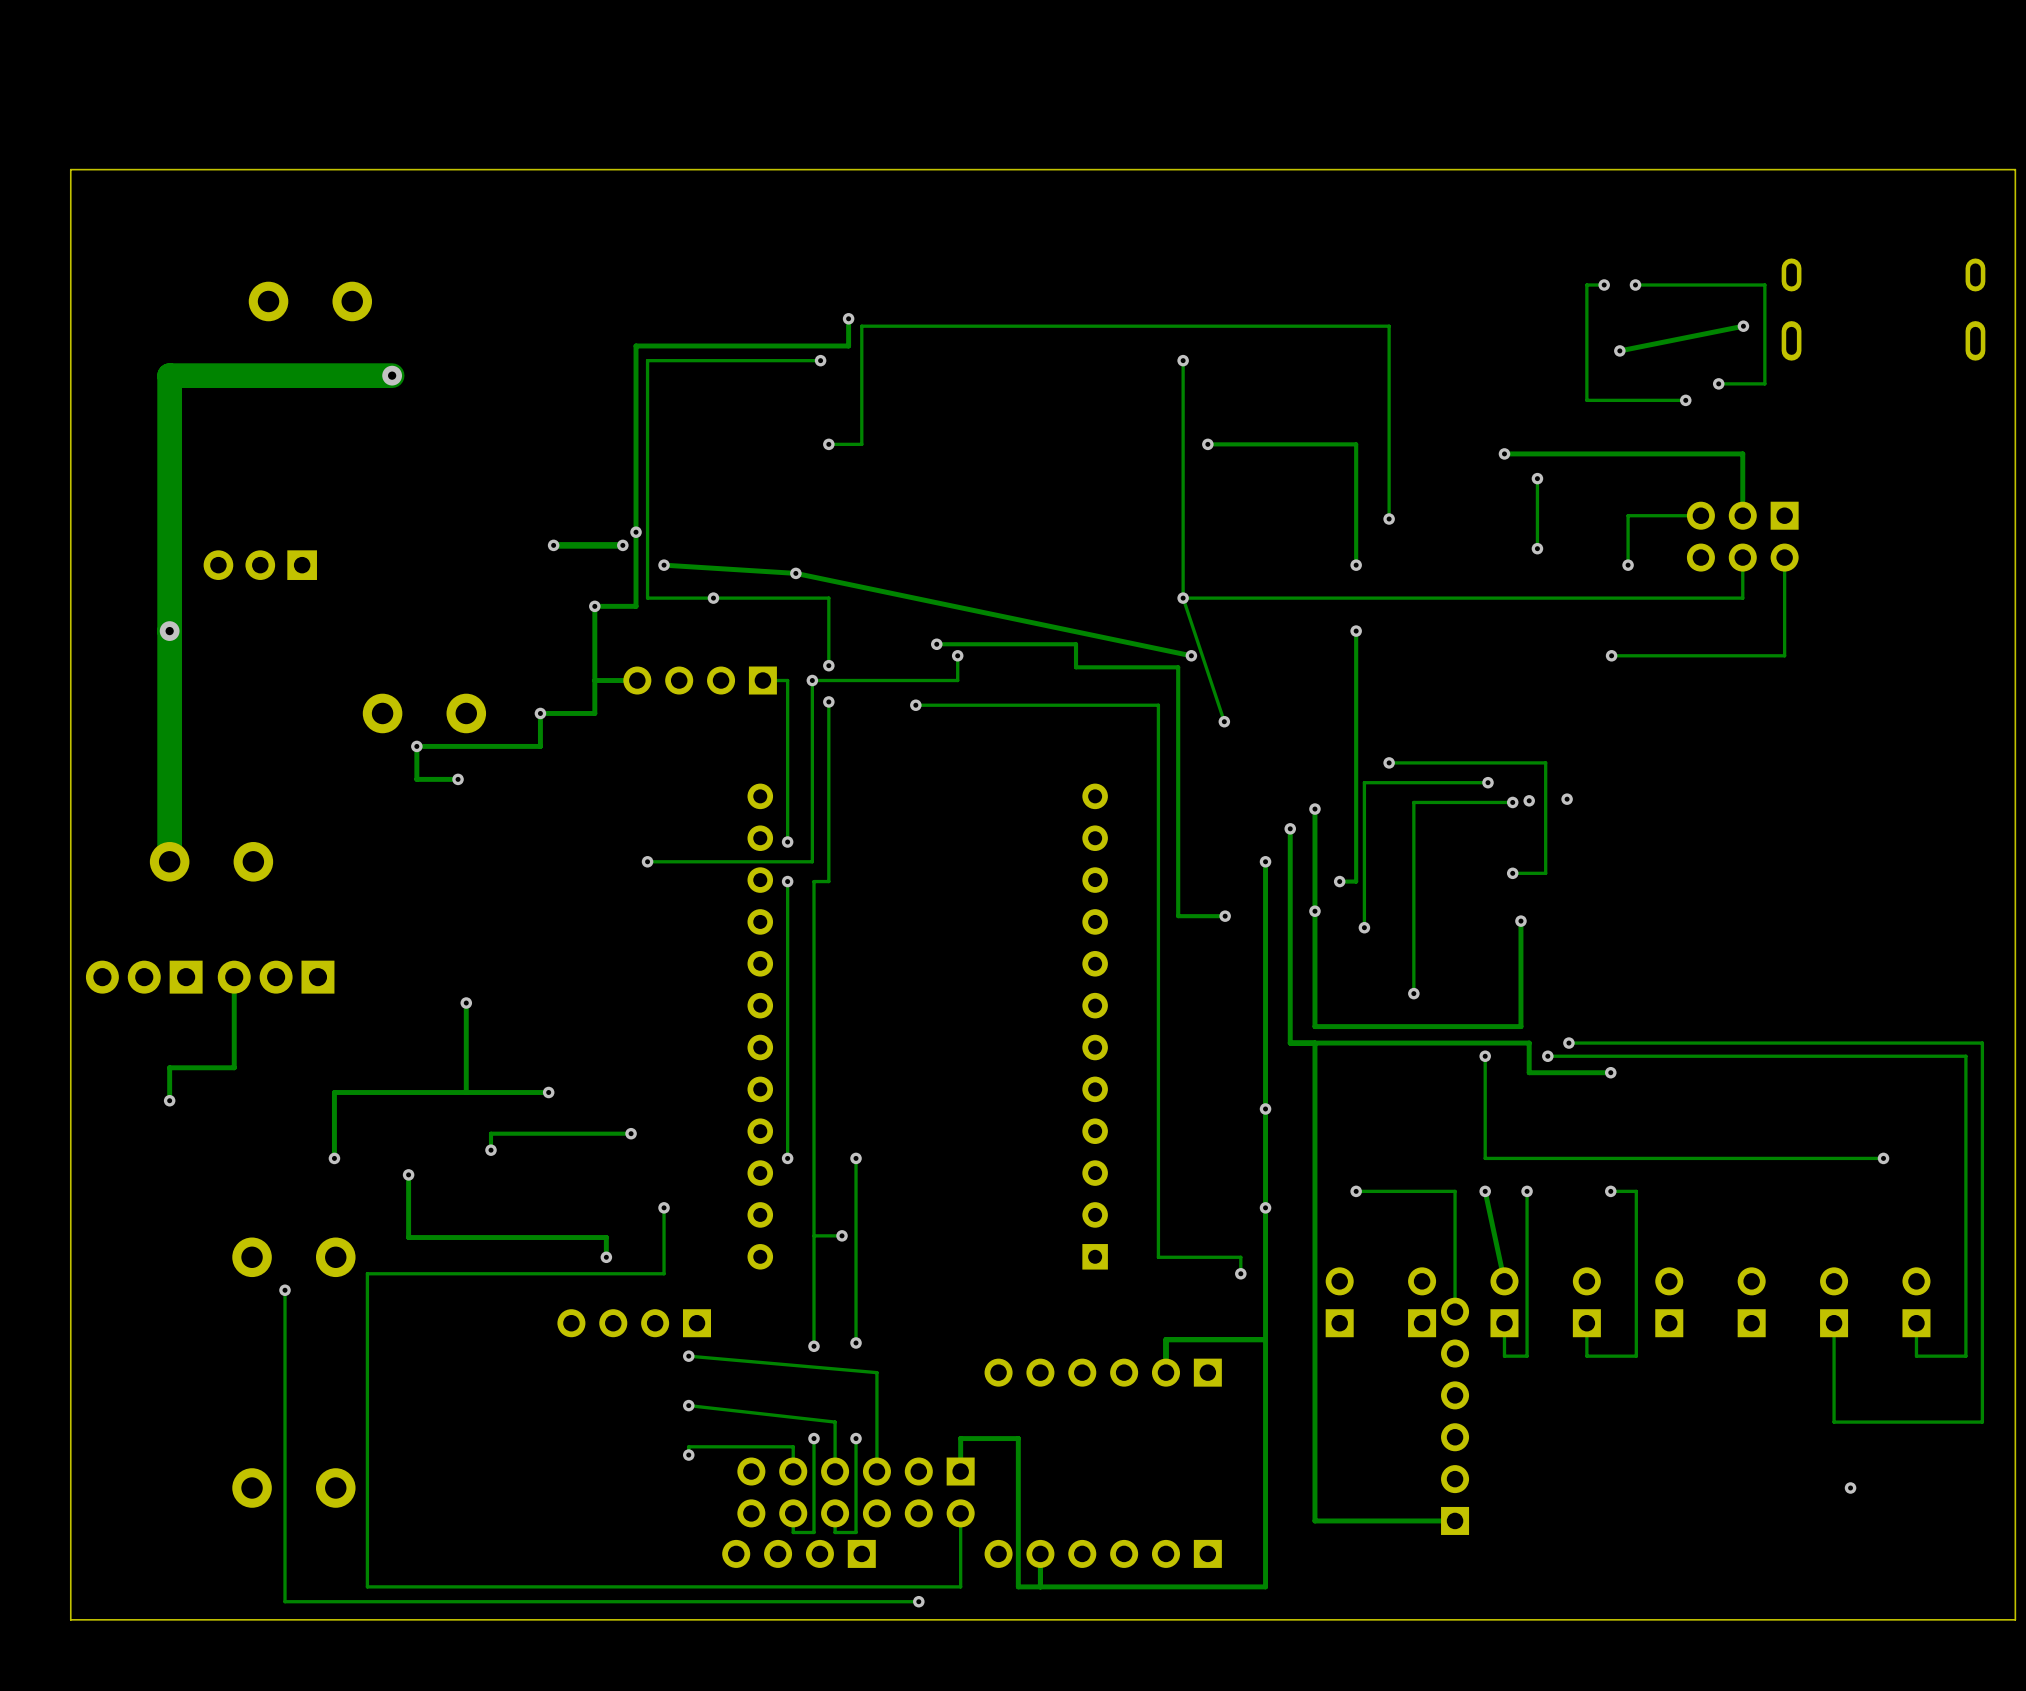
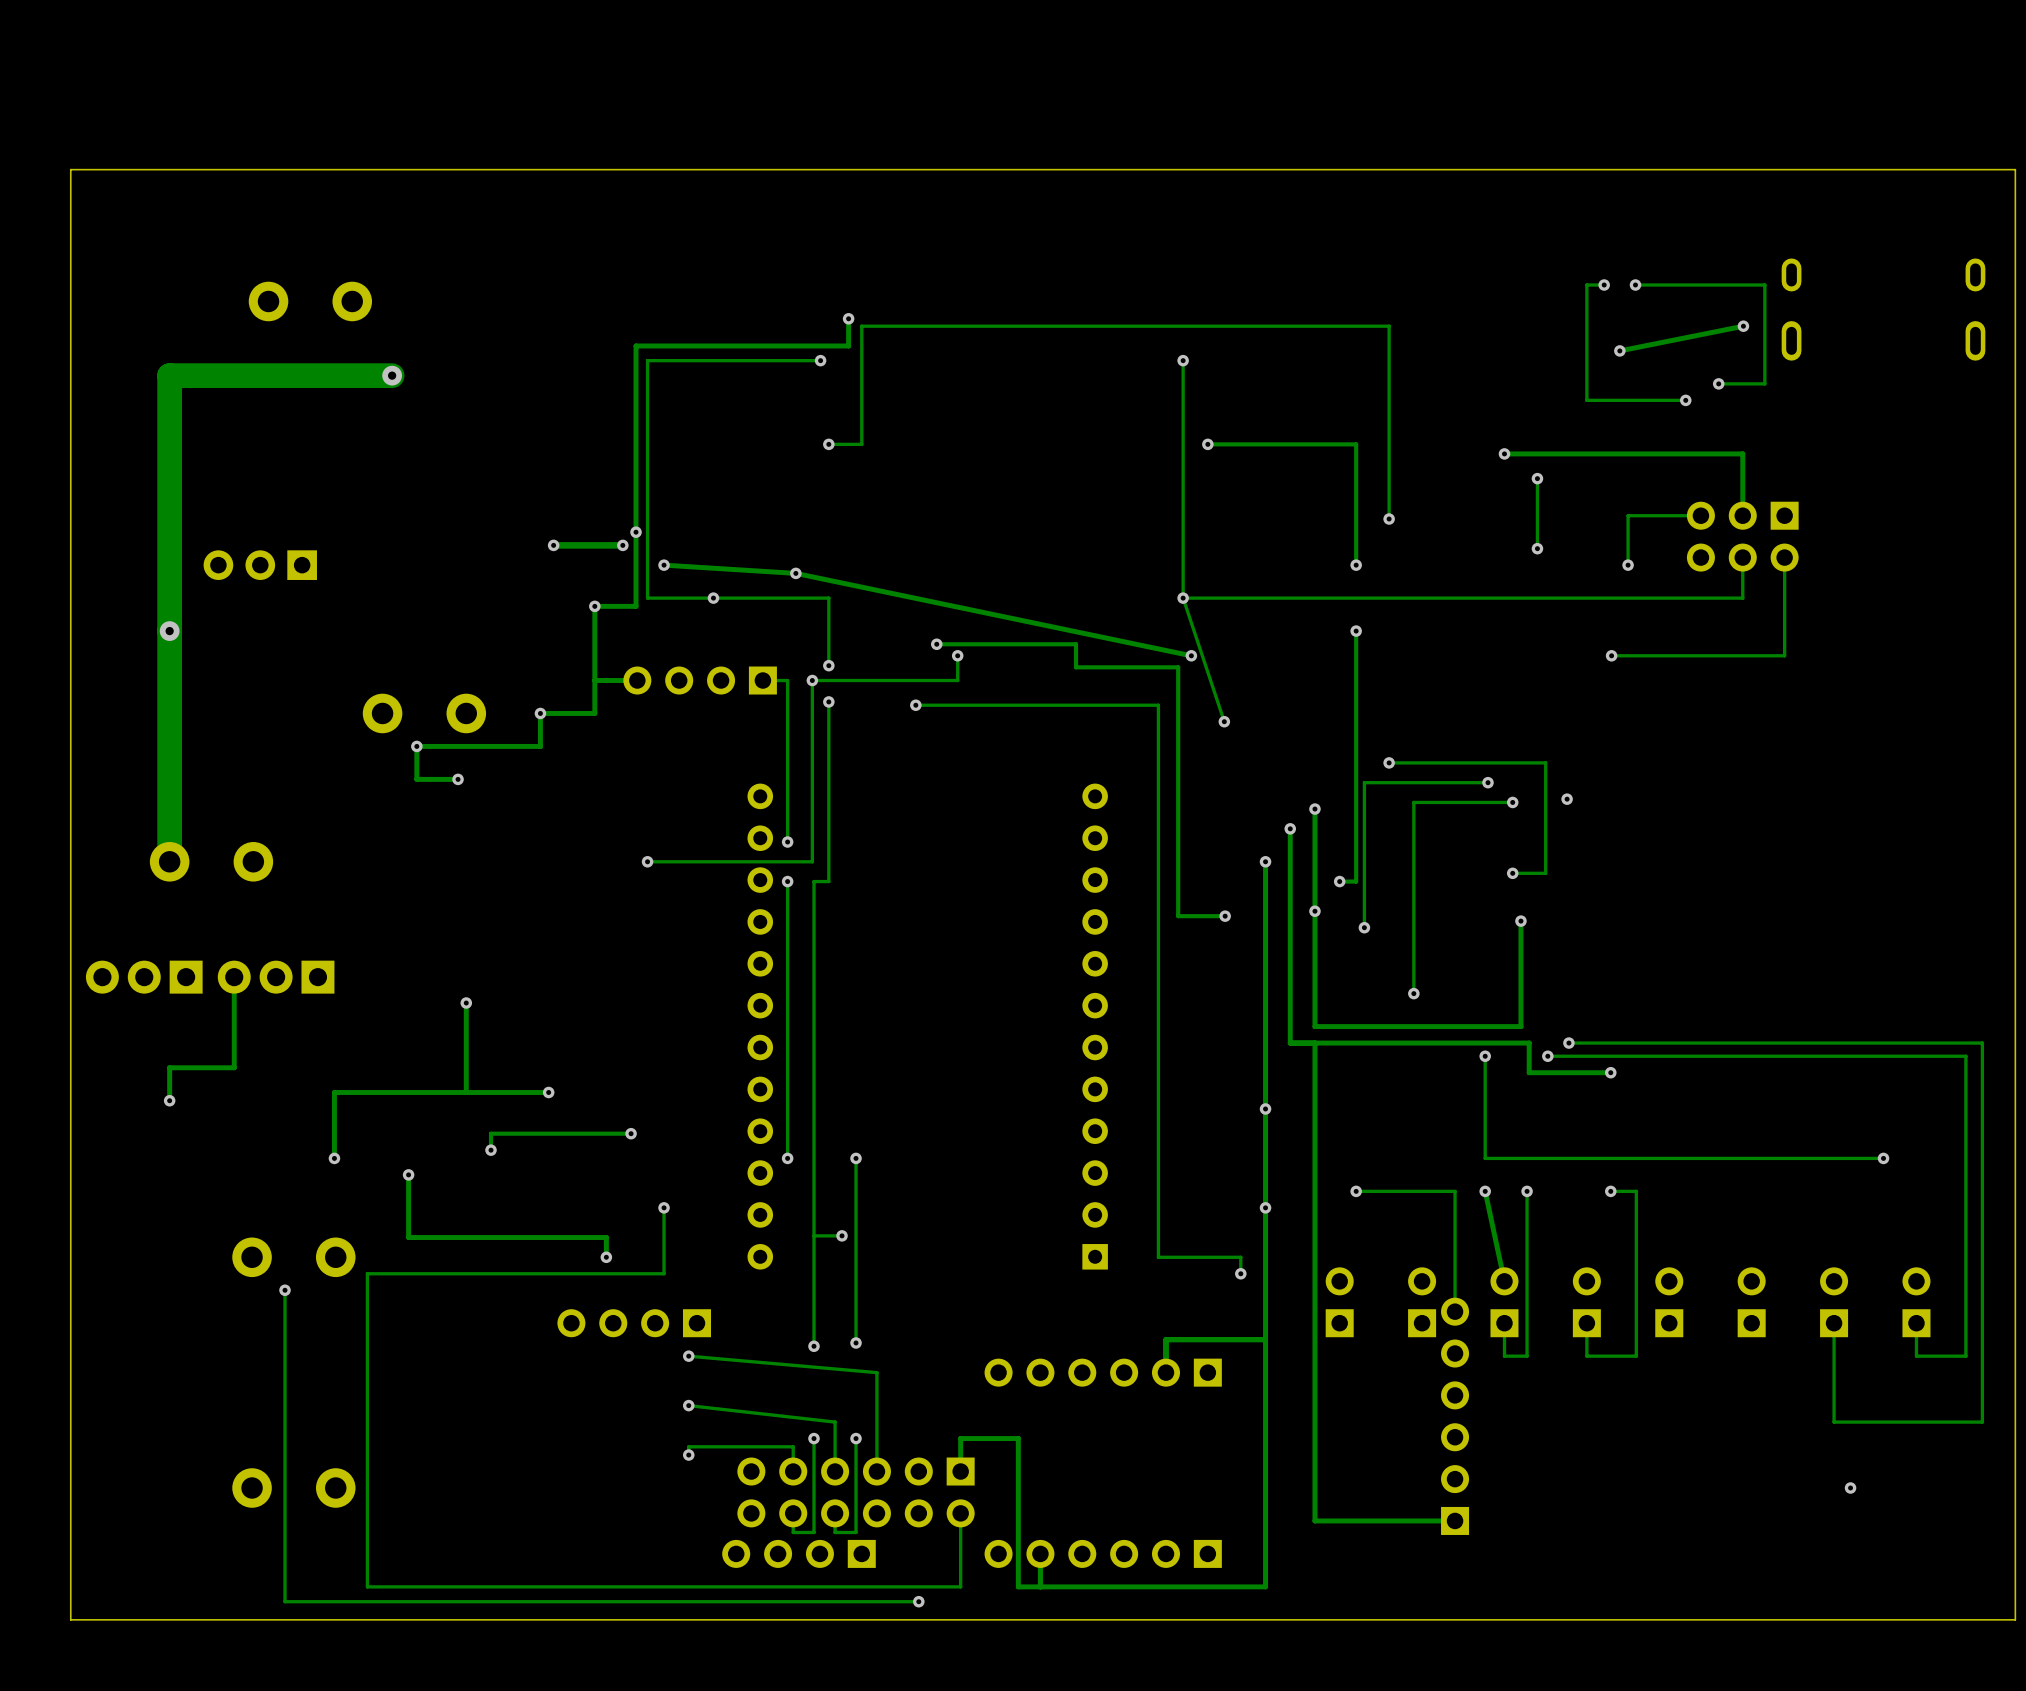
via: (1529, 800) -> none

